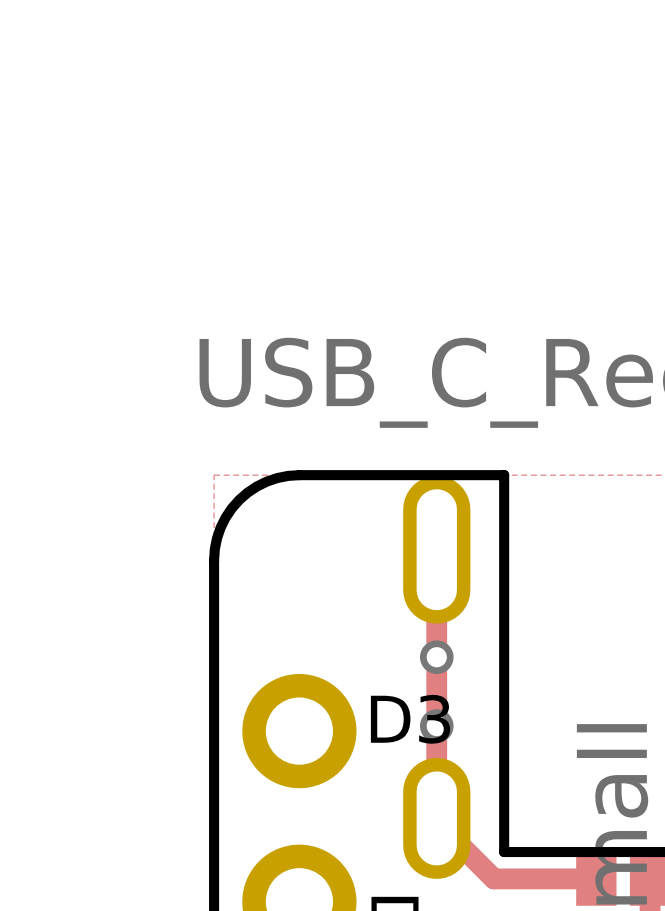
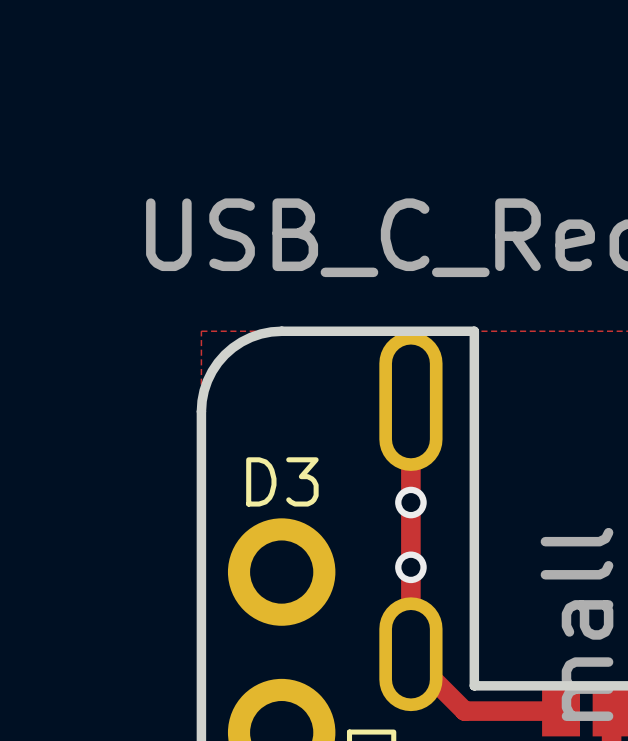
text position: D3 (410, 719) -> D3 (282, 481)

